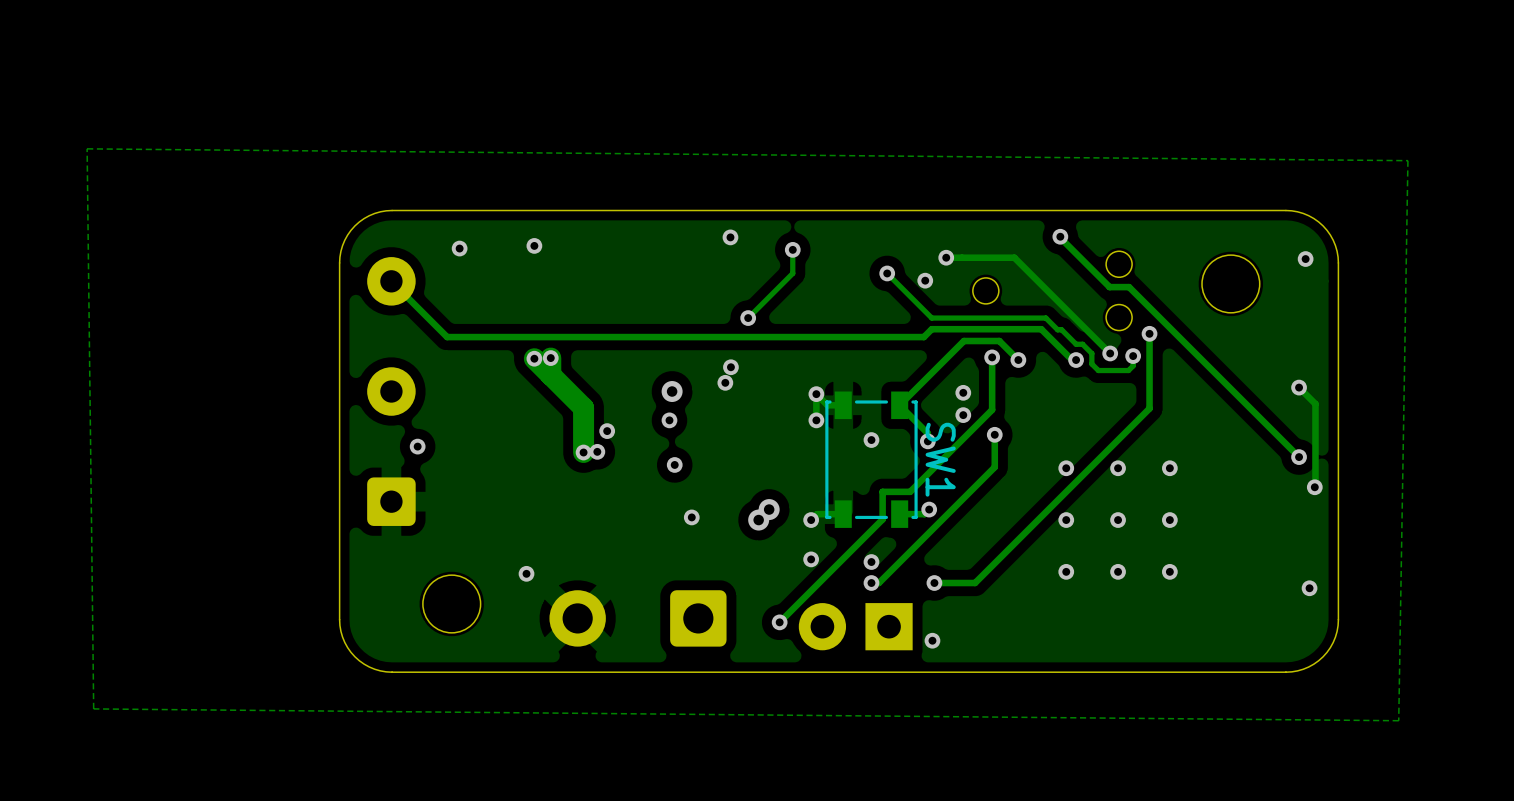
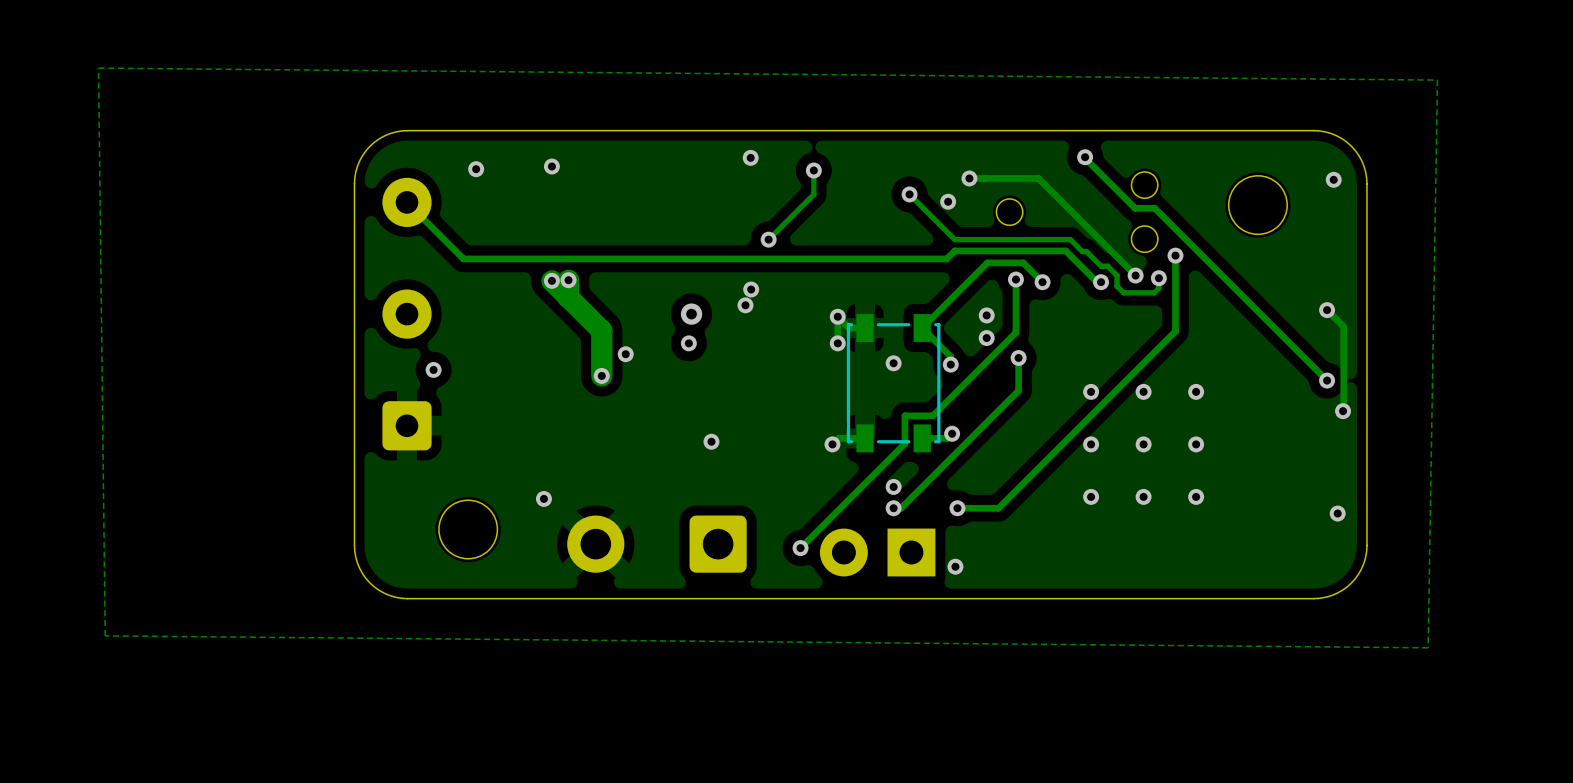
via: (597, 451) -> none
SW1 name: SW1 (940, 459) -> none
via: (674, 464) -> none
via: (769, 509) -> none
via: (758, 520) -> none
via: (811, 559) -> none

